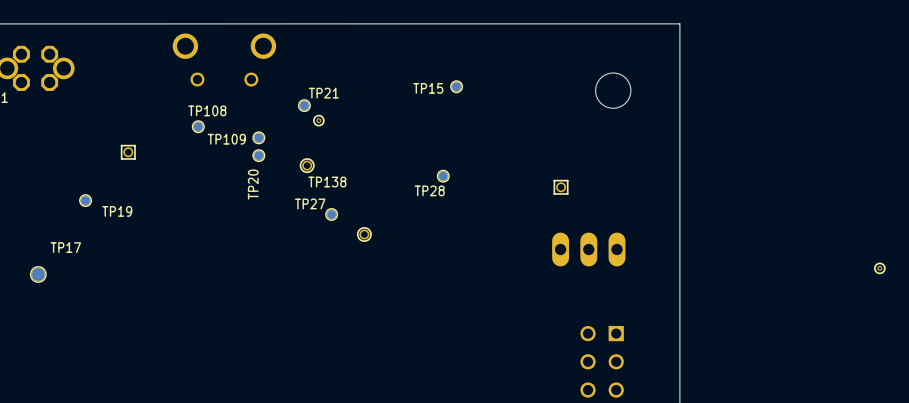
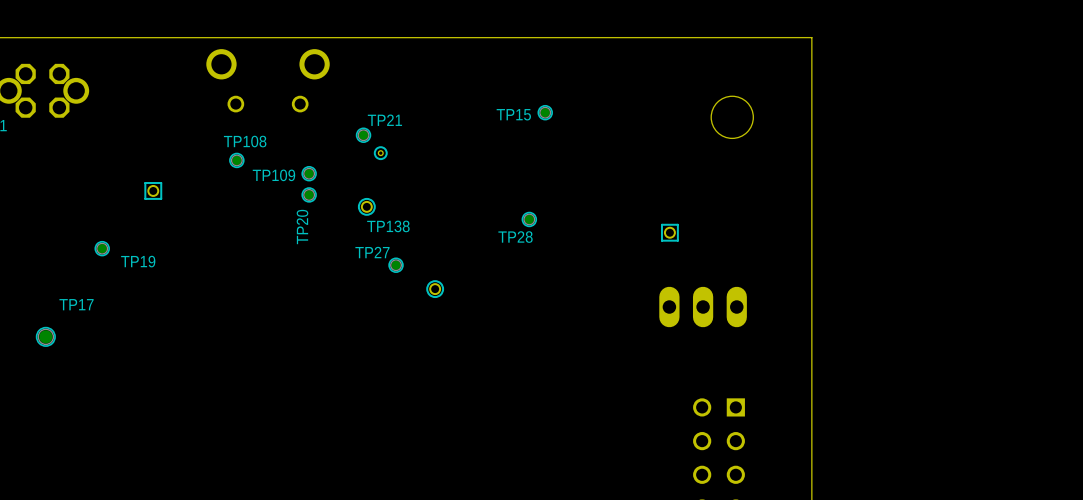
part: (879, 268) -> none

